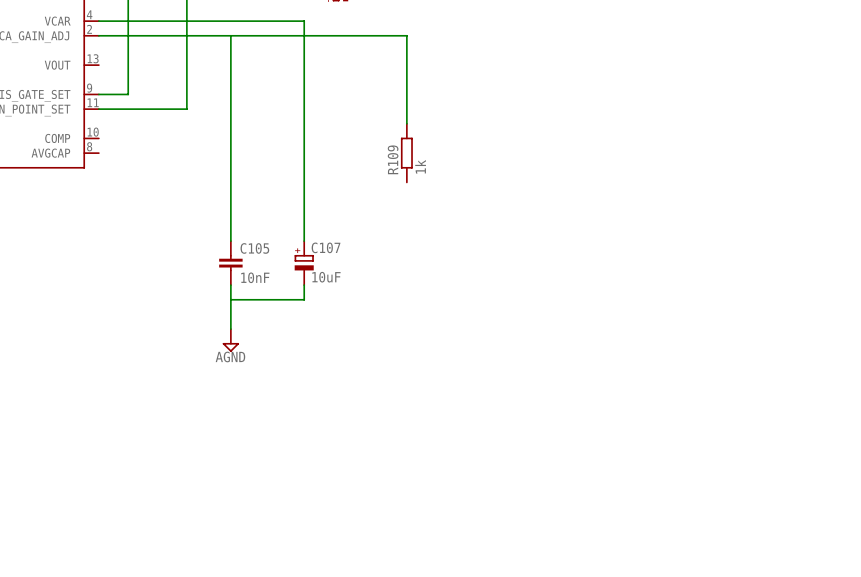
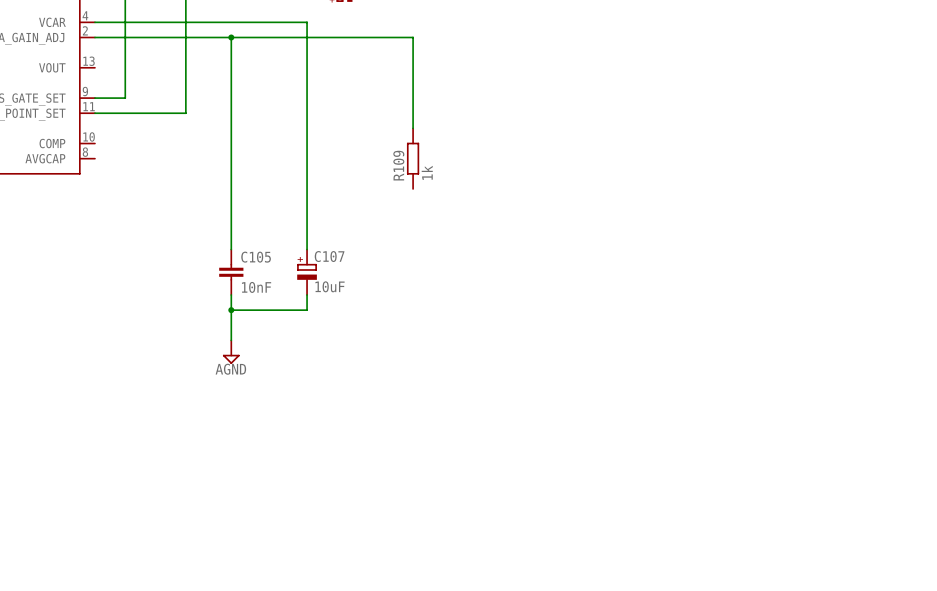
junction: none -> (231, 37)
junction: none -> (231, 310)

